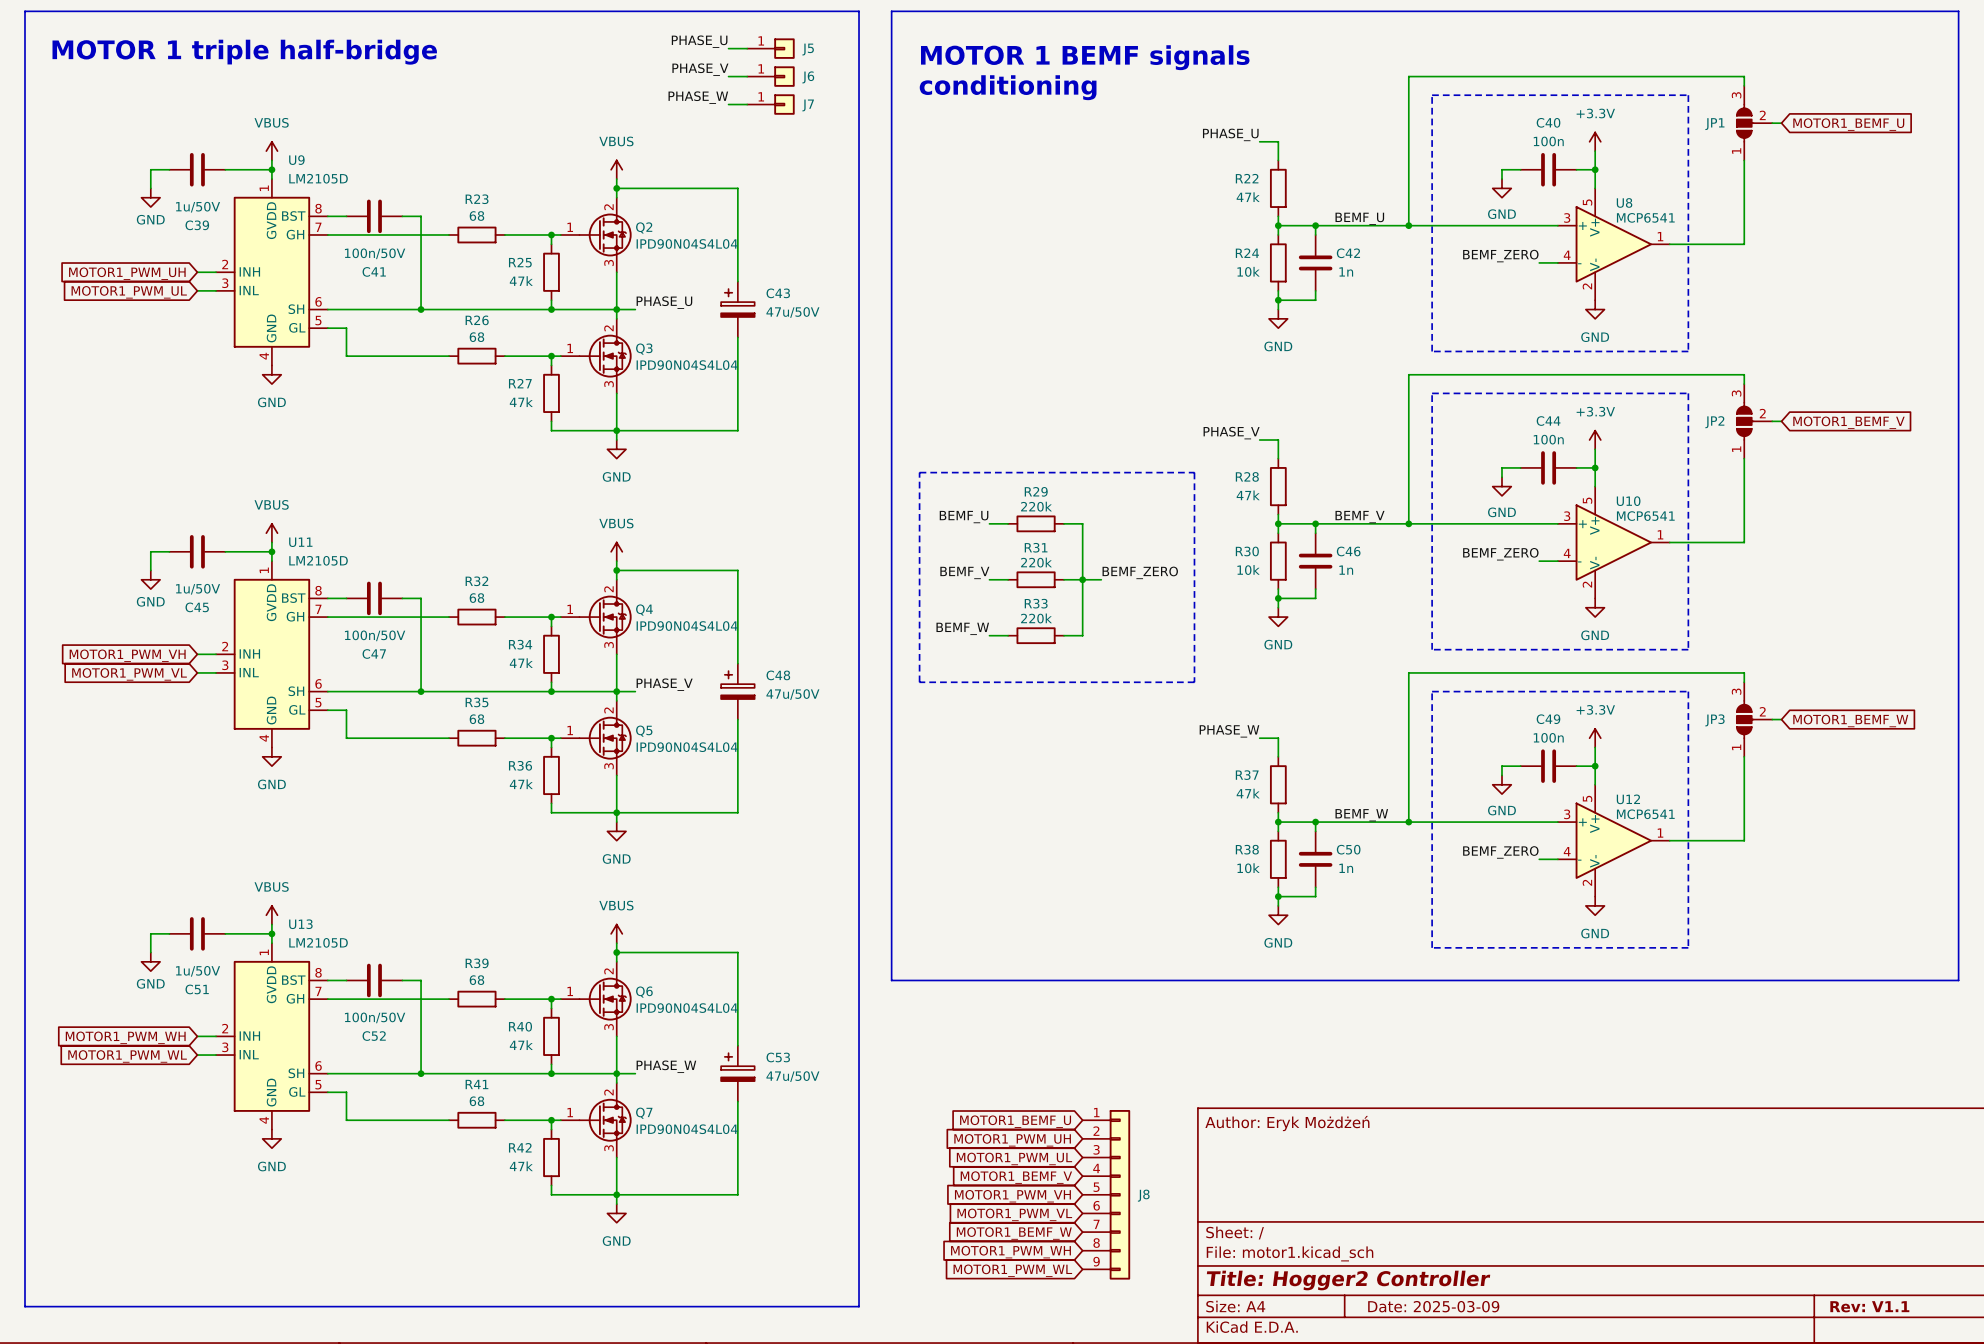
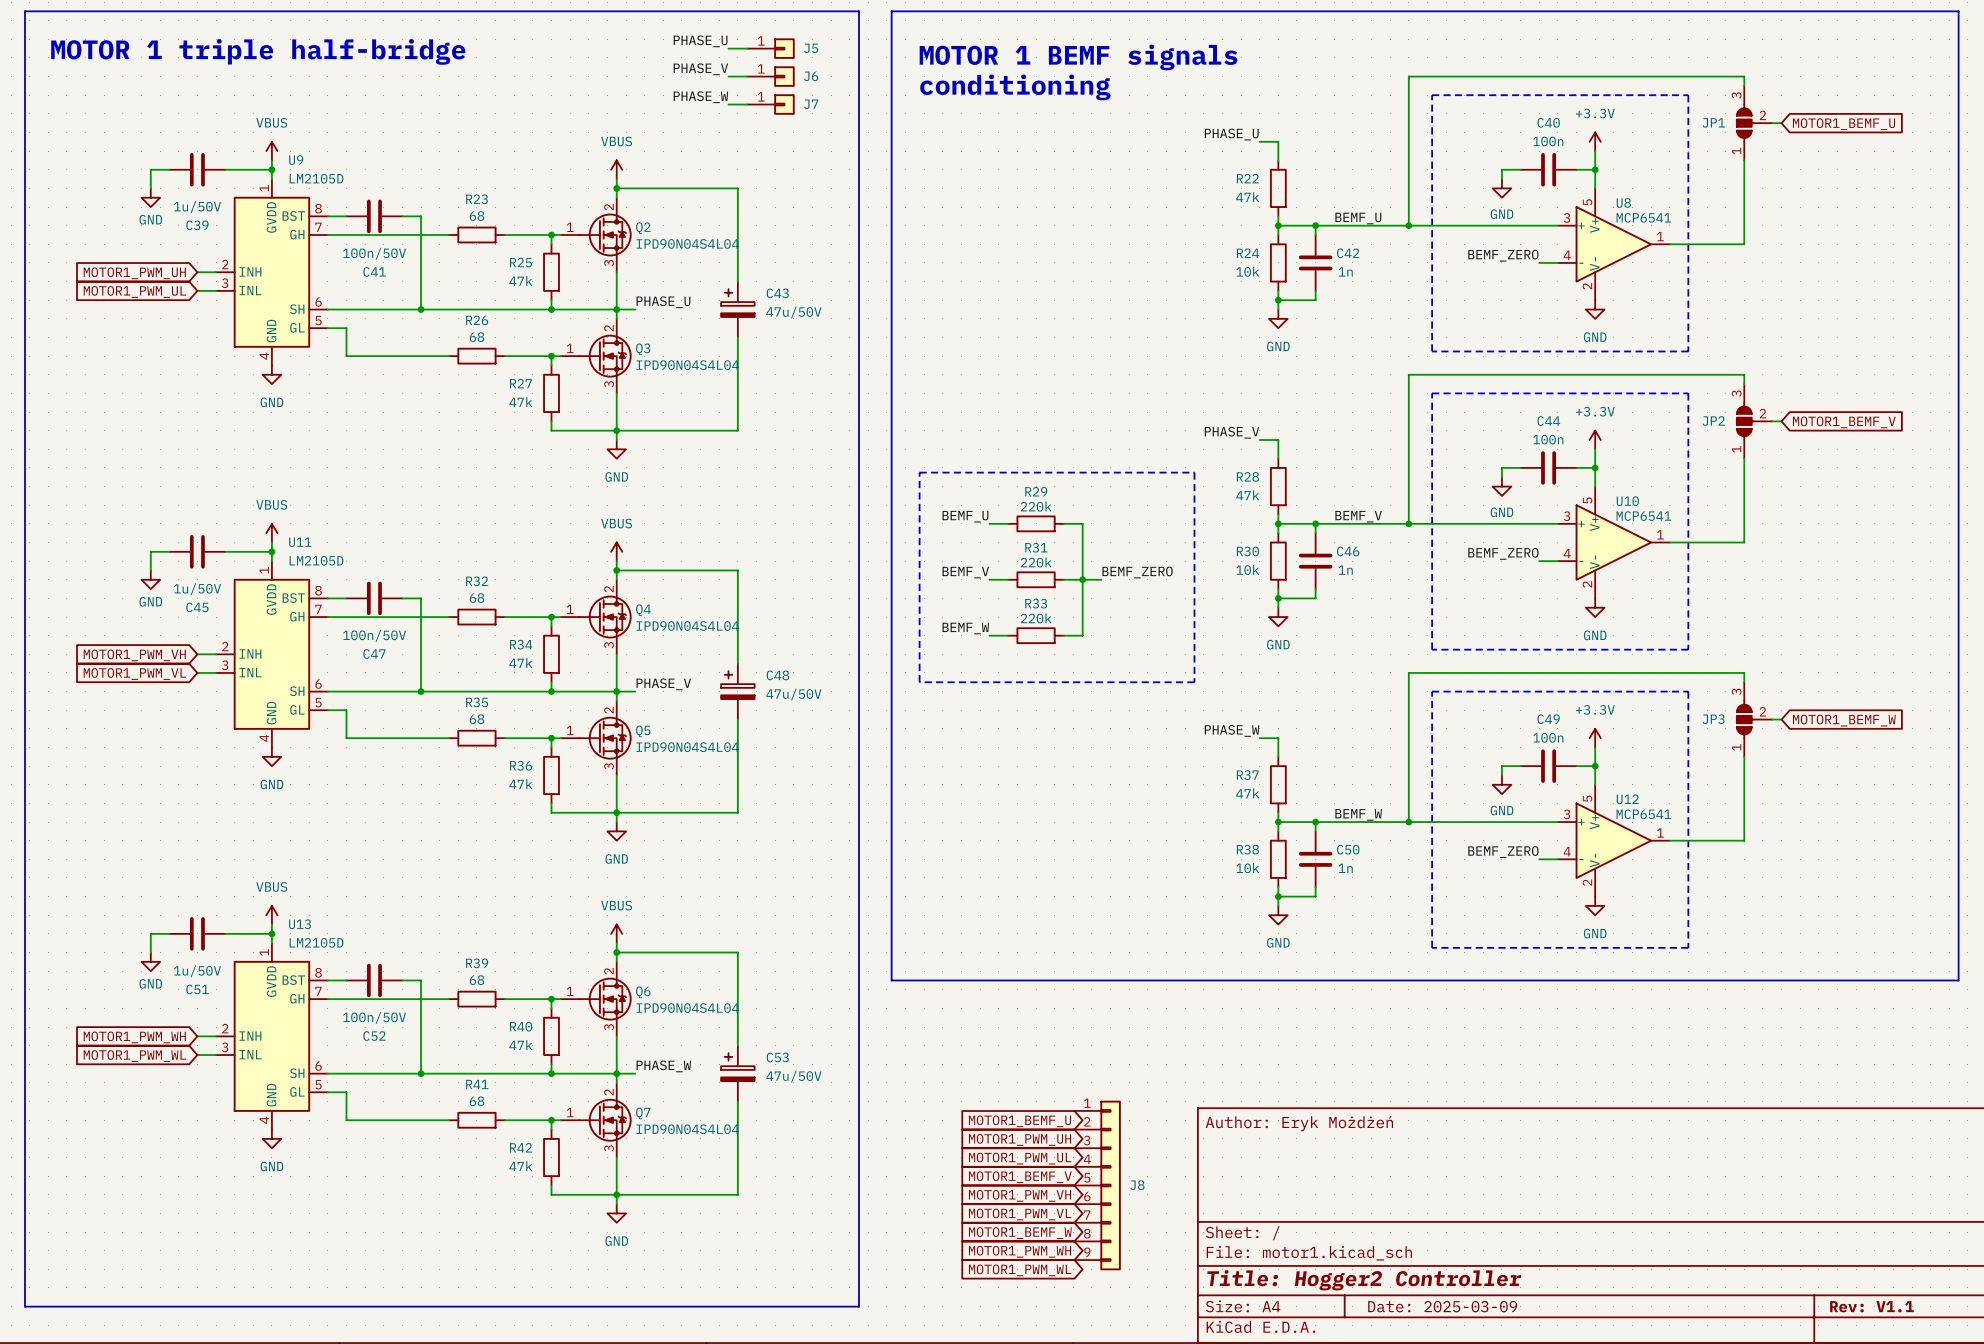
J8 position: (1106, 1194) -> (1097, 1185)

